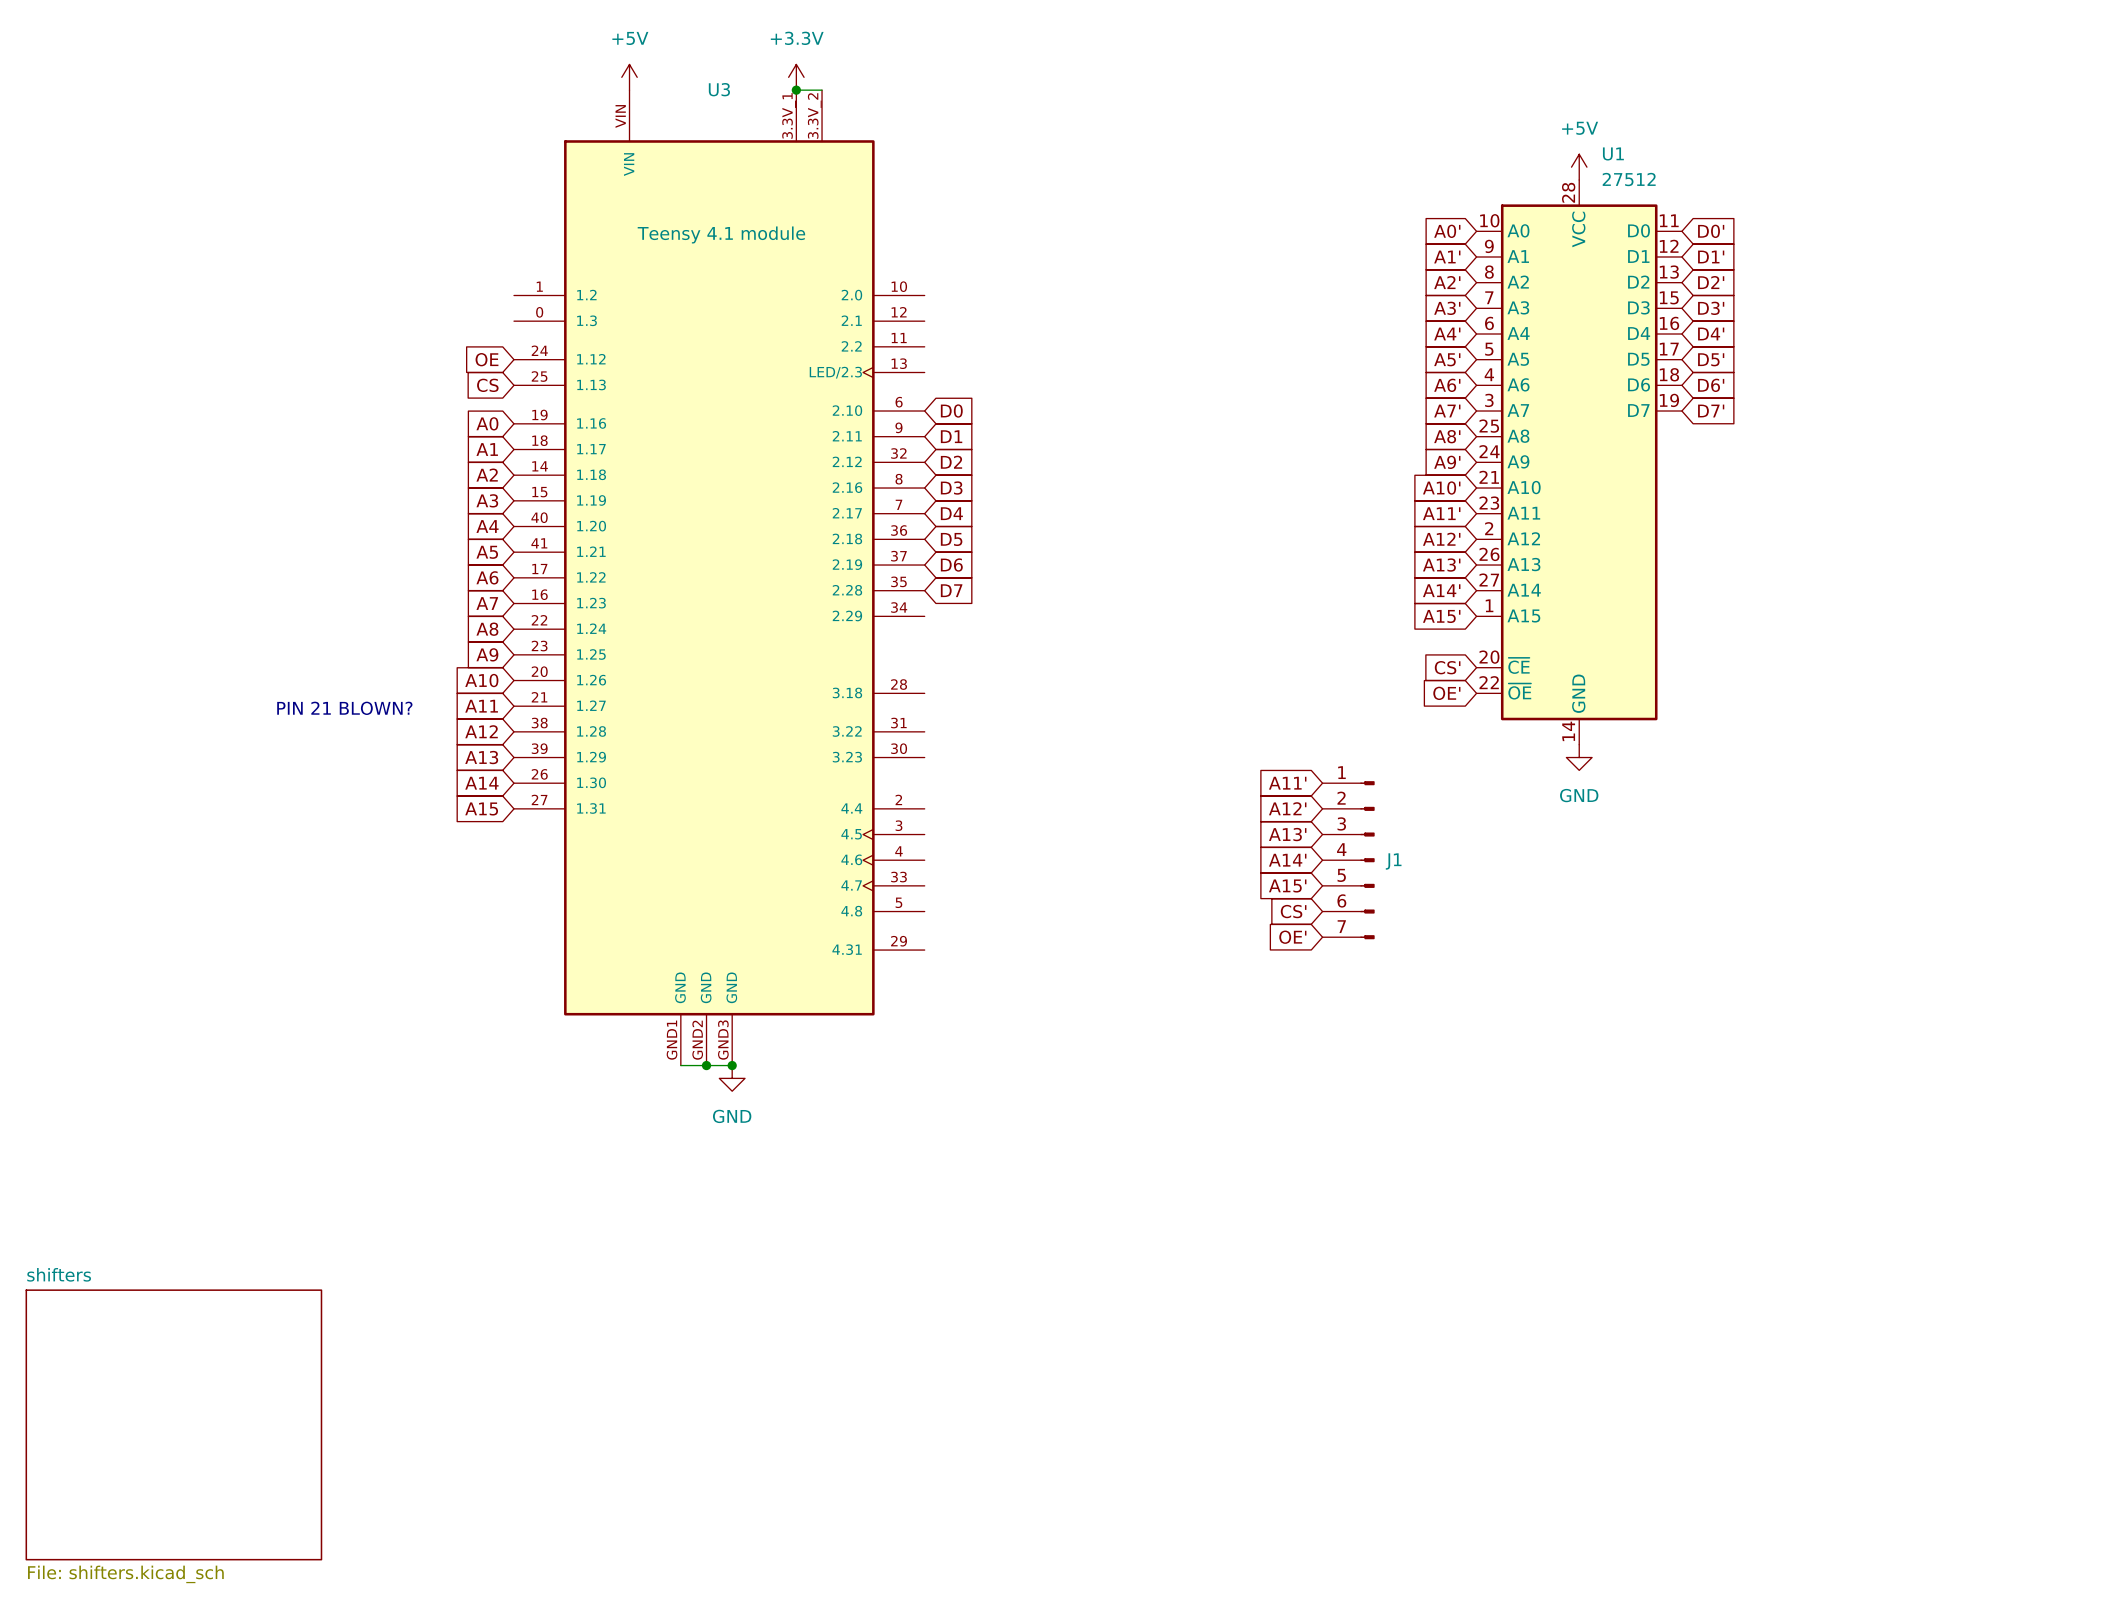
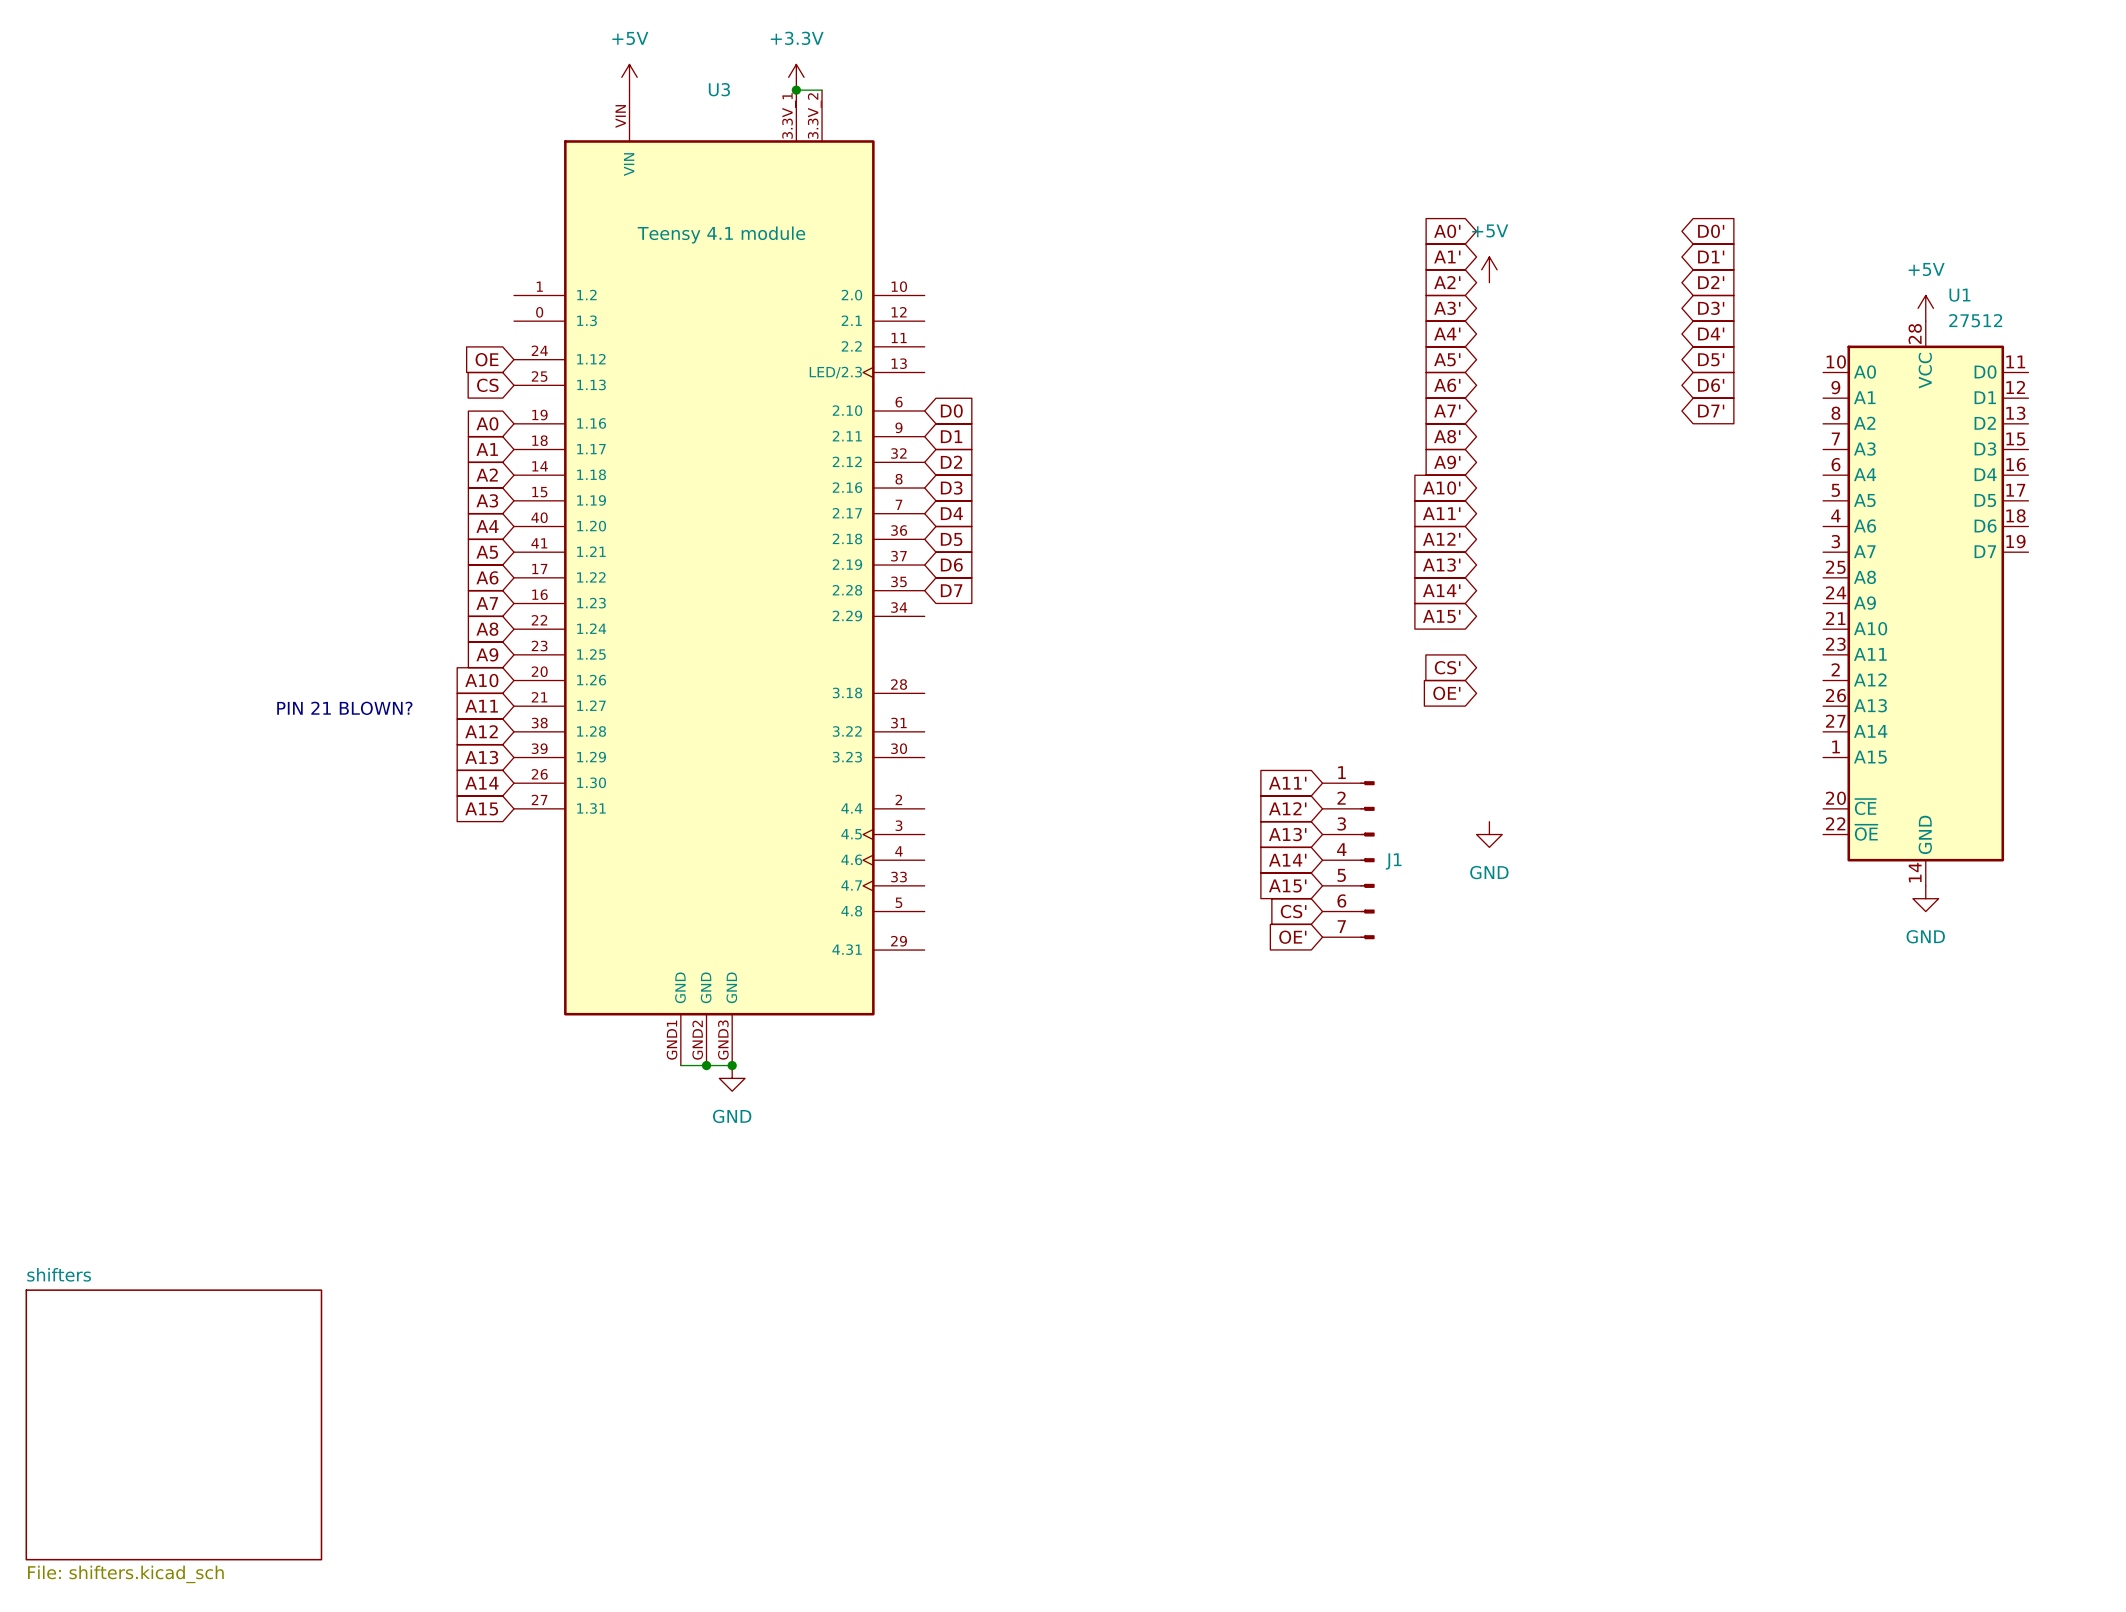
power symbol position: +5V (1579, 167) -> +5V (1489, 269)
power symbol: none -> +5V (1925, 308)
U1 position: (1579, 462) -> (1925, 603)
power symbol position: GND (1579, 757) -> GND (1489, 834)
power symbol: none -> GND (1925, 898)

